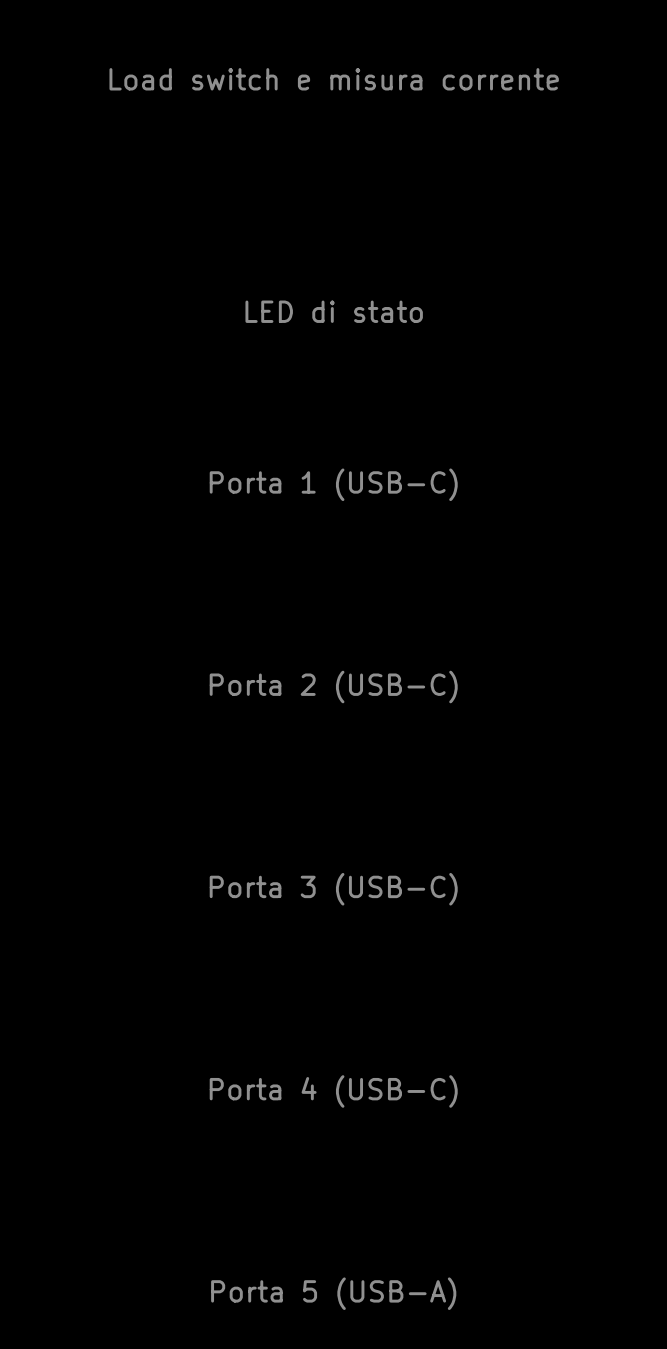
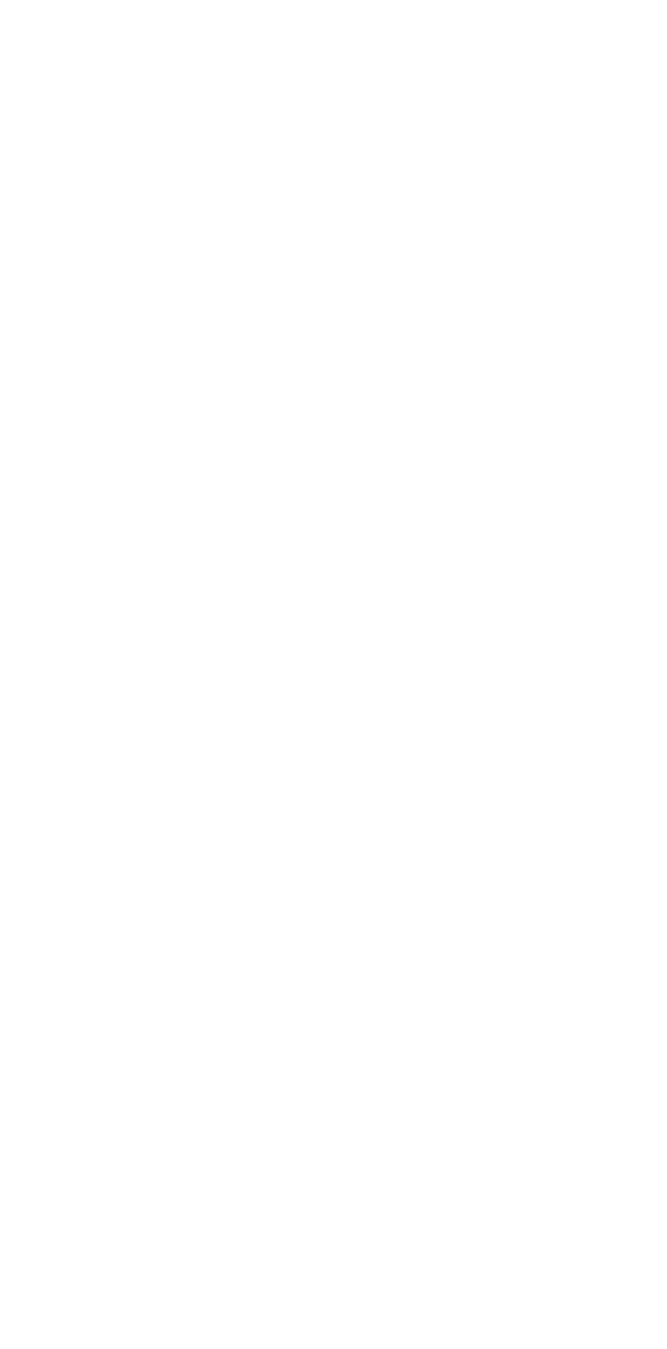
text: Load switch e misura corrente (334, 79) -> none
text: LED di stato (334, 311) -> none
text: Porta 1 (USB-C) (333, 484) -> none
text: Porta 2 (USB-C) (333, 687) -> none
text: Porta 3 (USB-C) (333, 889) -> none
text: Porta 4 (USB-C) (333, 1091) -> none
text: Porta 5 (USB-A) (333, 1293) -> none

